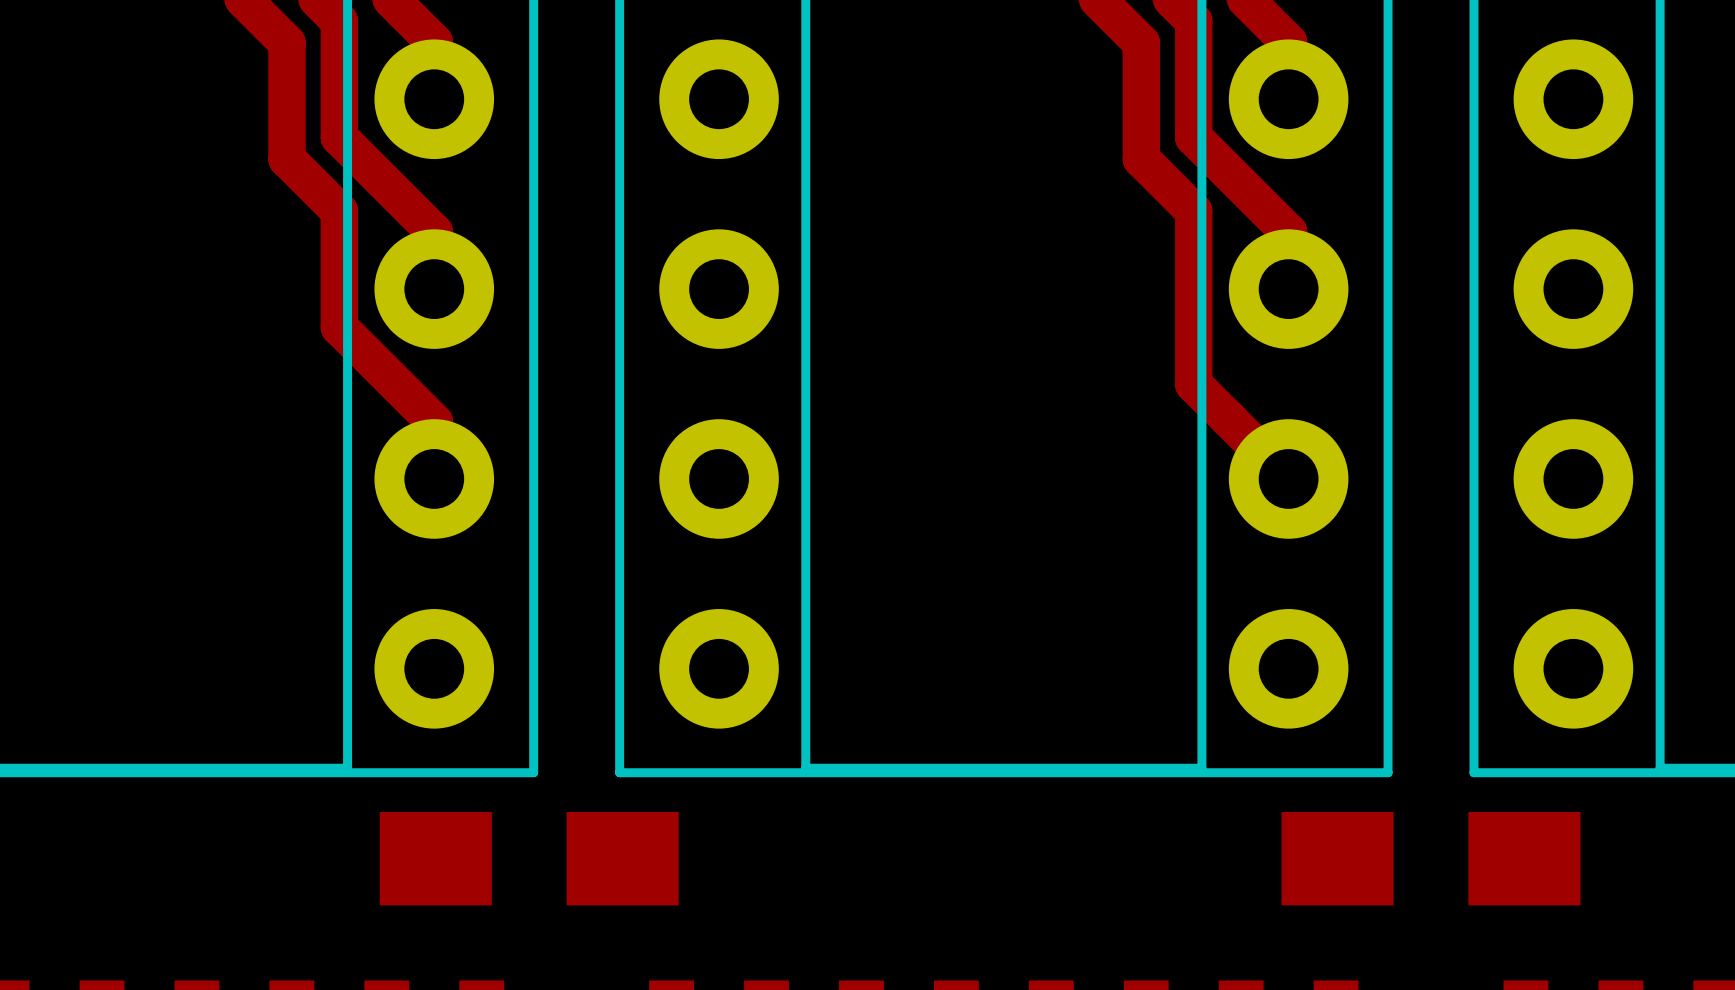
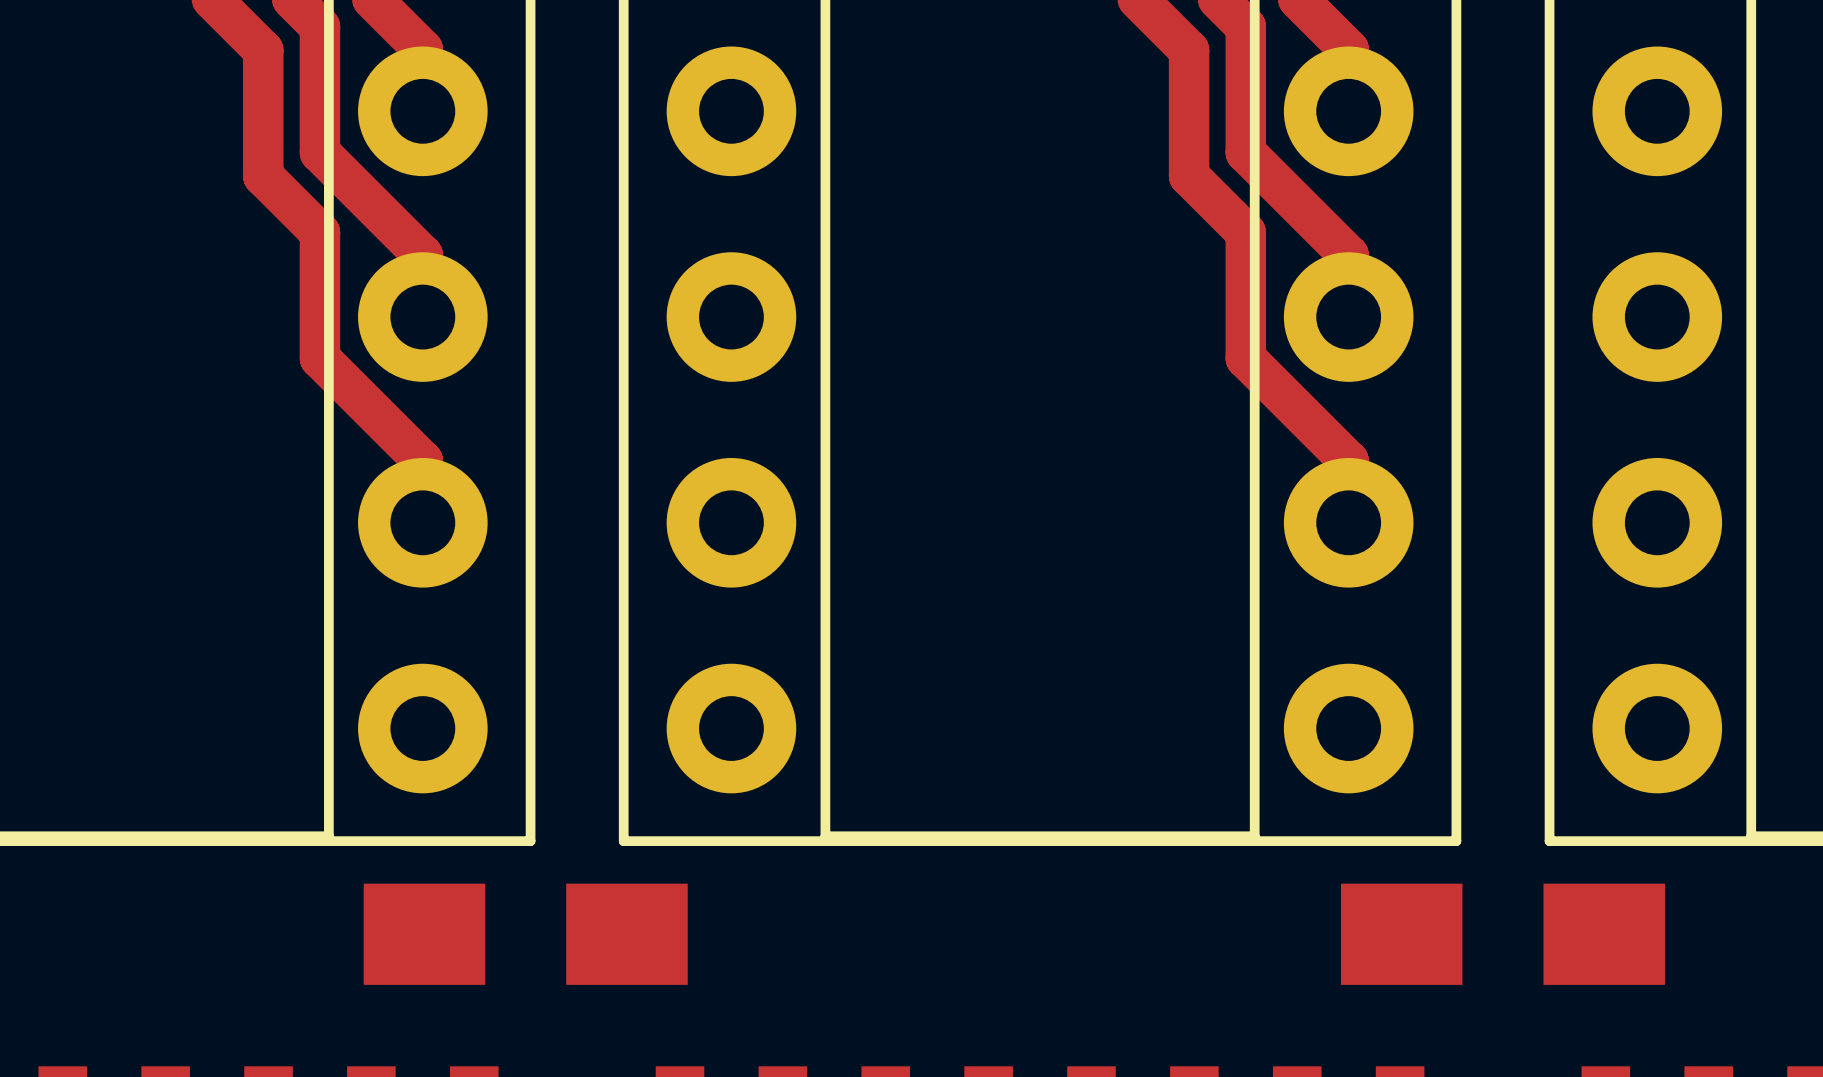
top track: (1193, 327) (1193, 384) (1288, 478) -> (1245, 358) (1348, 461) (1348, 522)

